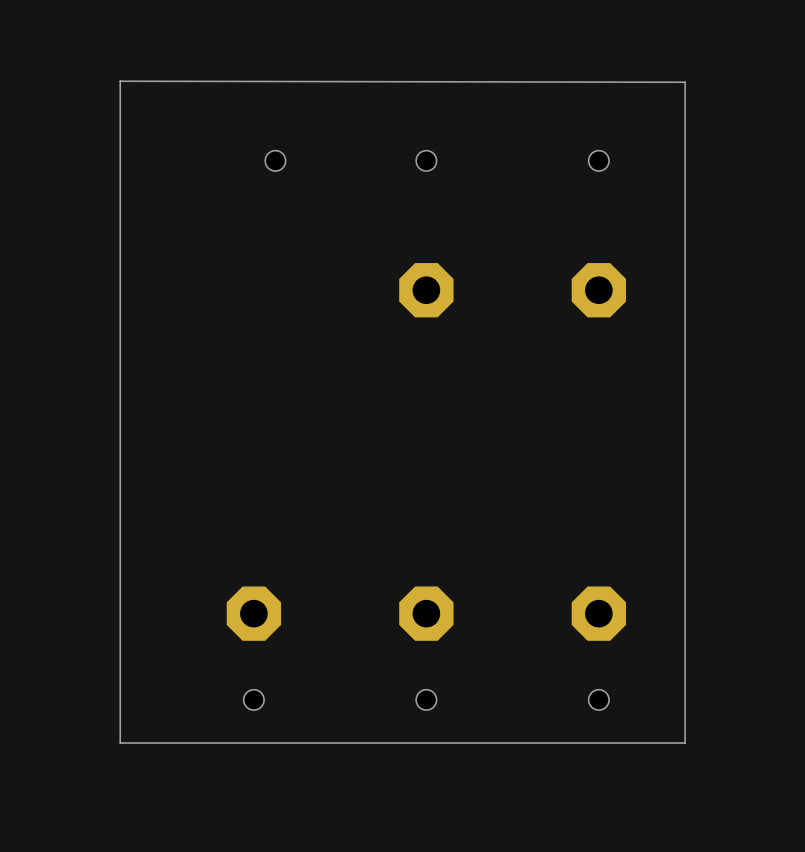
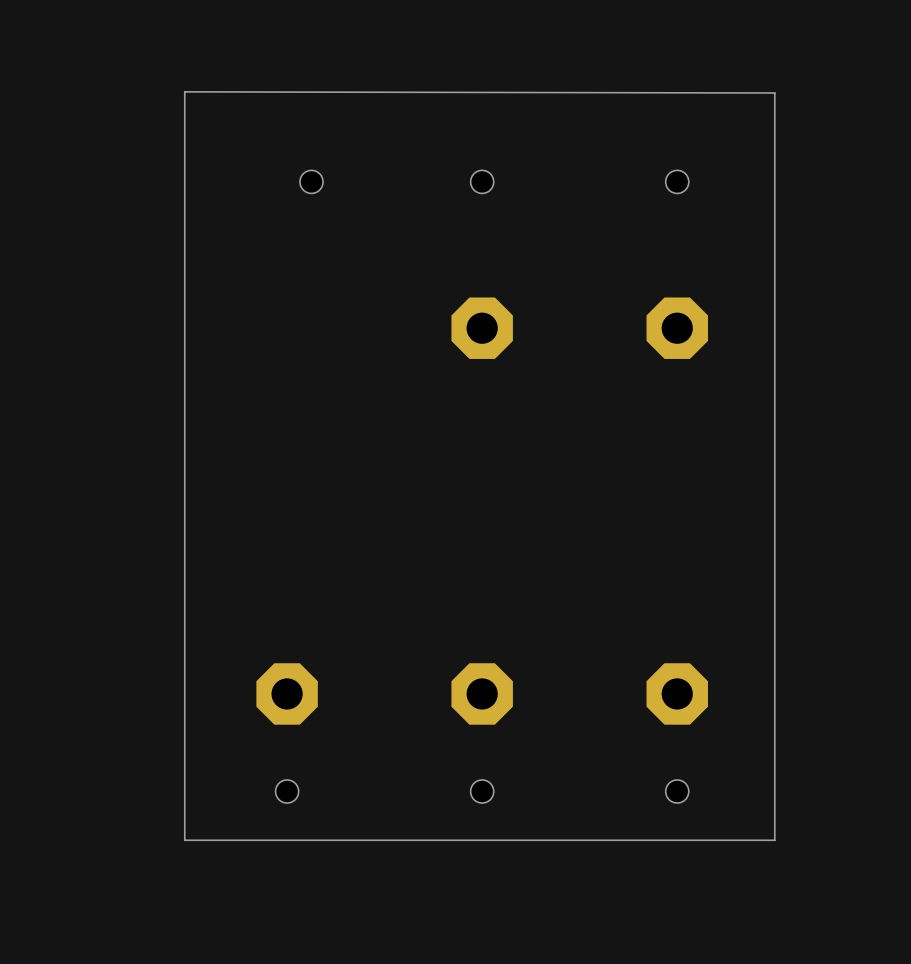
board edge: (163, 81) (120, 81) (120, 743) (163, 743) -> (184, 91) (184, 840)

